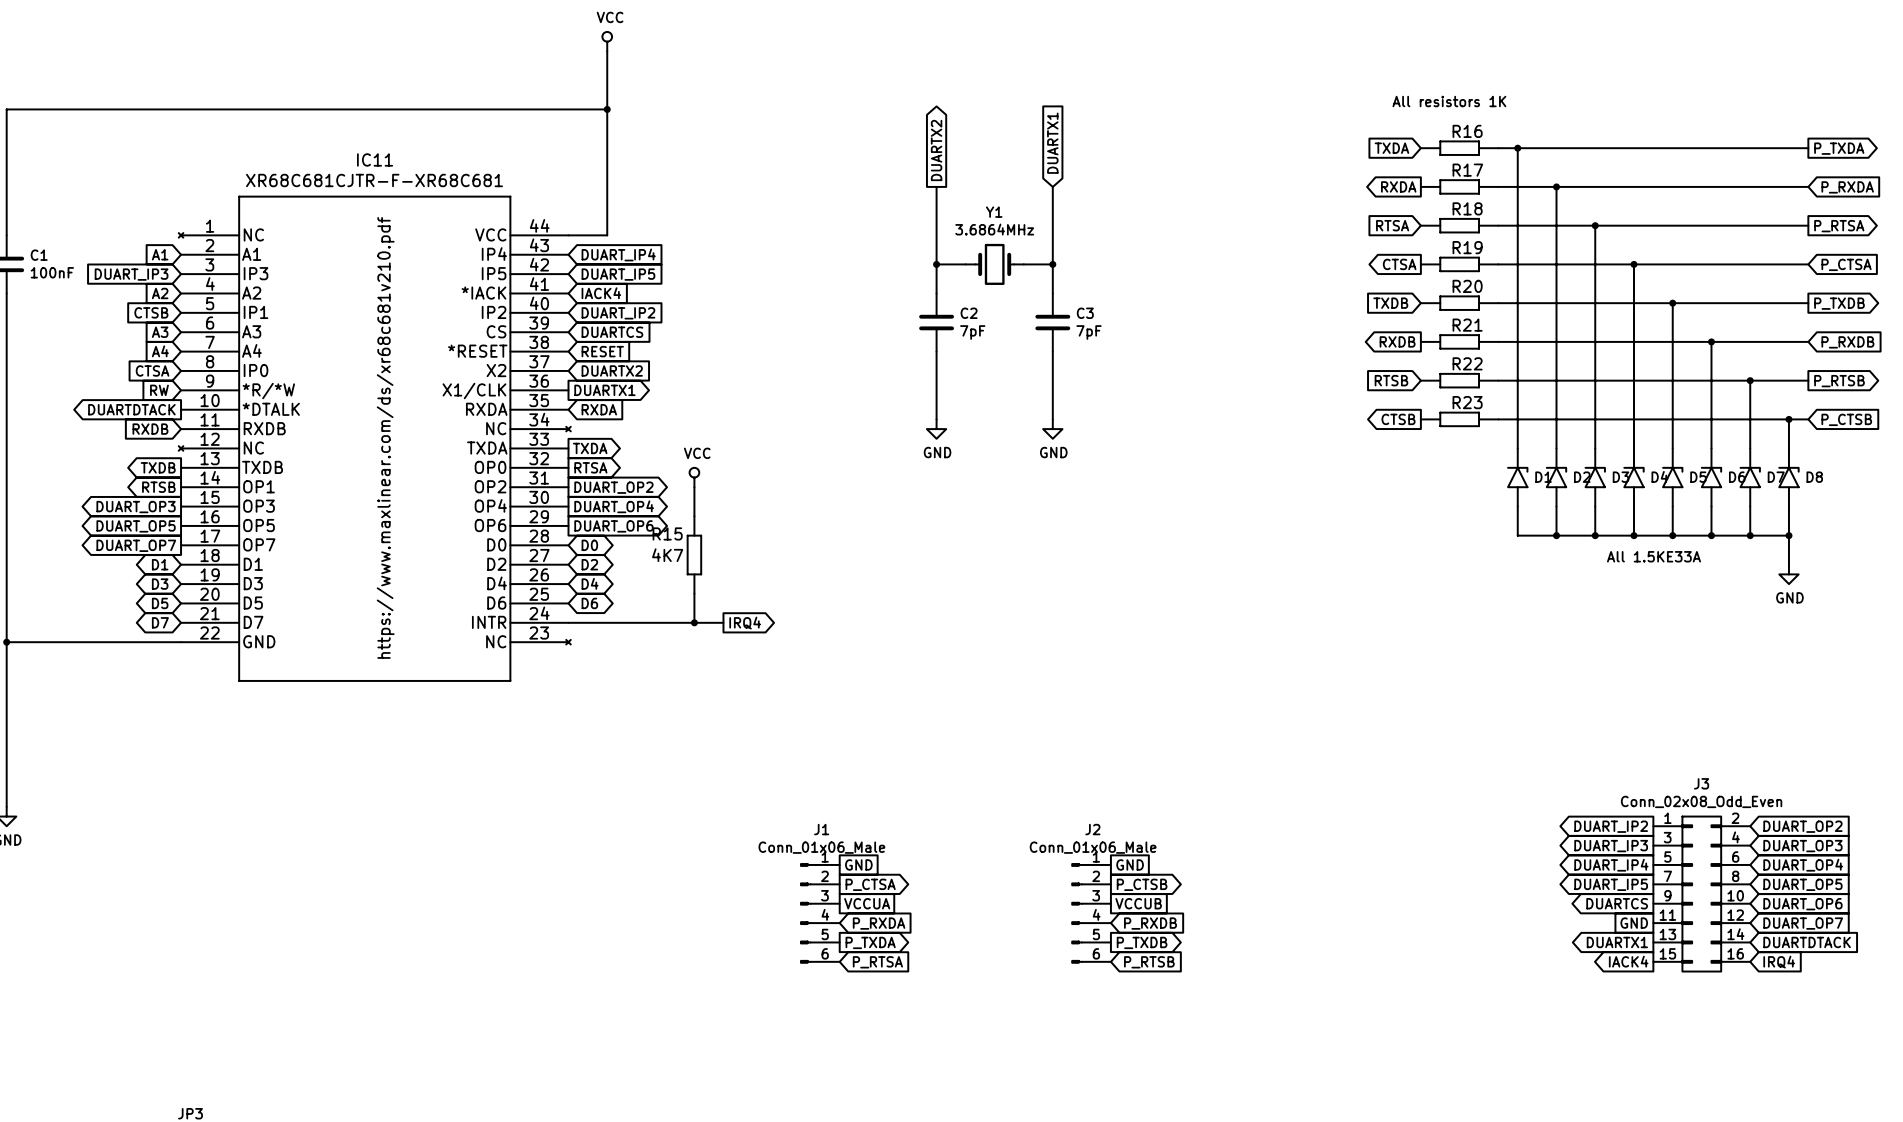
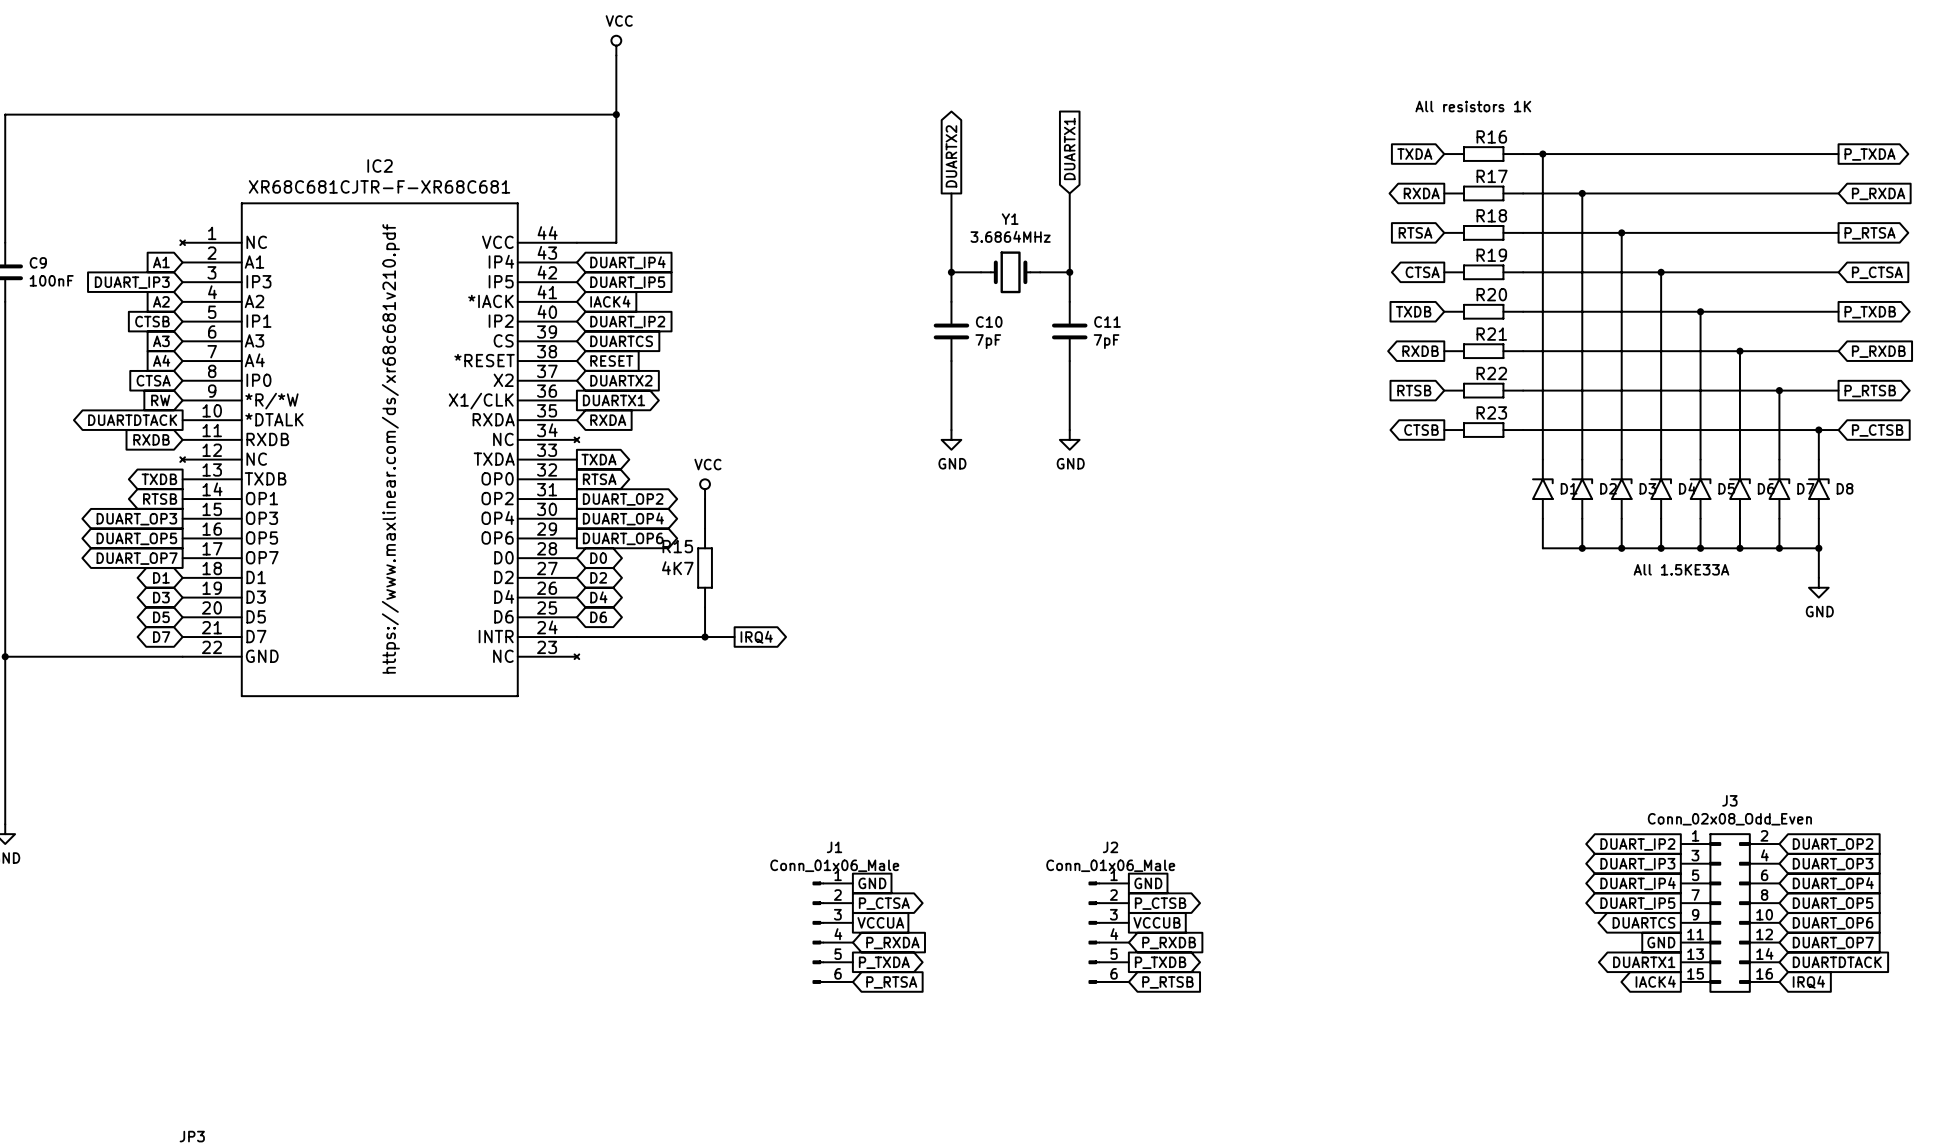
IC11 name: IC11 (375, 159) -> IC2 (380, 166)
C1 name: C1 (39, 255) -> C9 (38, 262)
C2 name: C2 (969, 313) -> C10 (989, 322)
C3 name: C3 (1085, 313) -> C11 (1107, 322)

